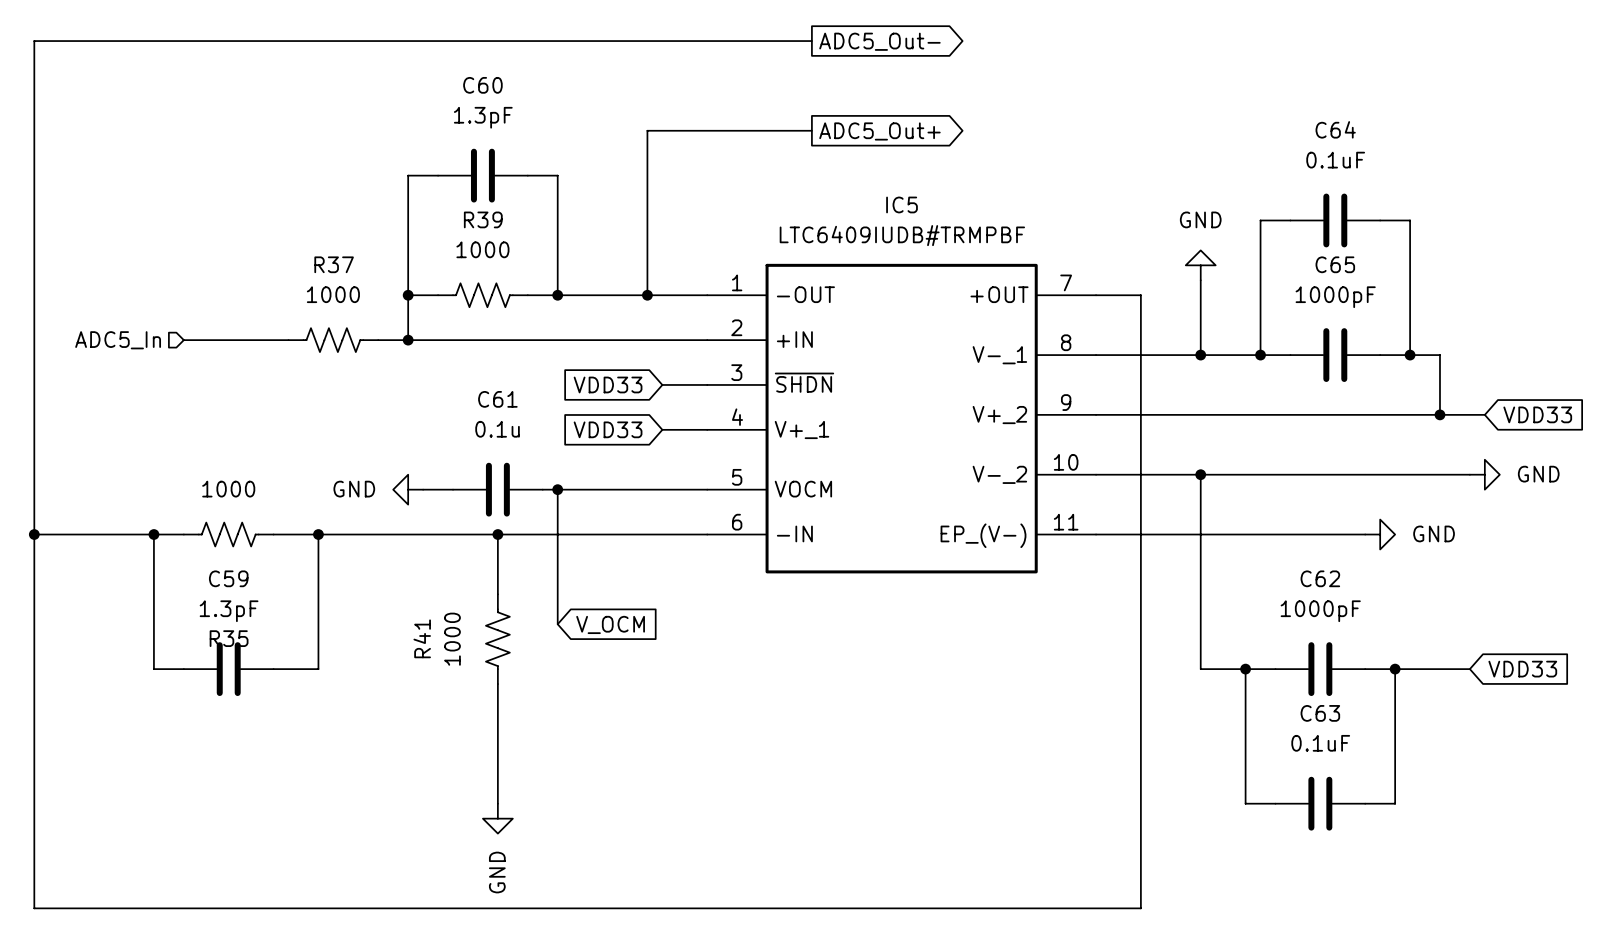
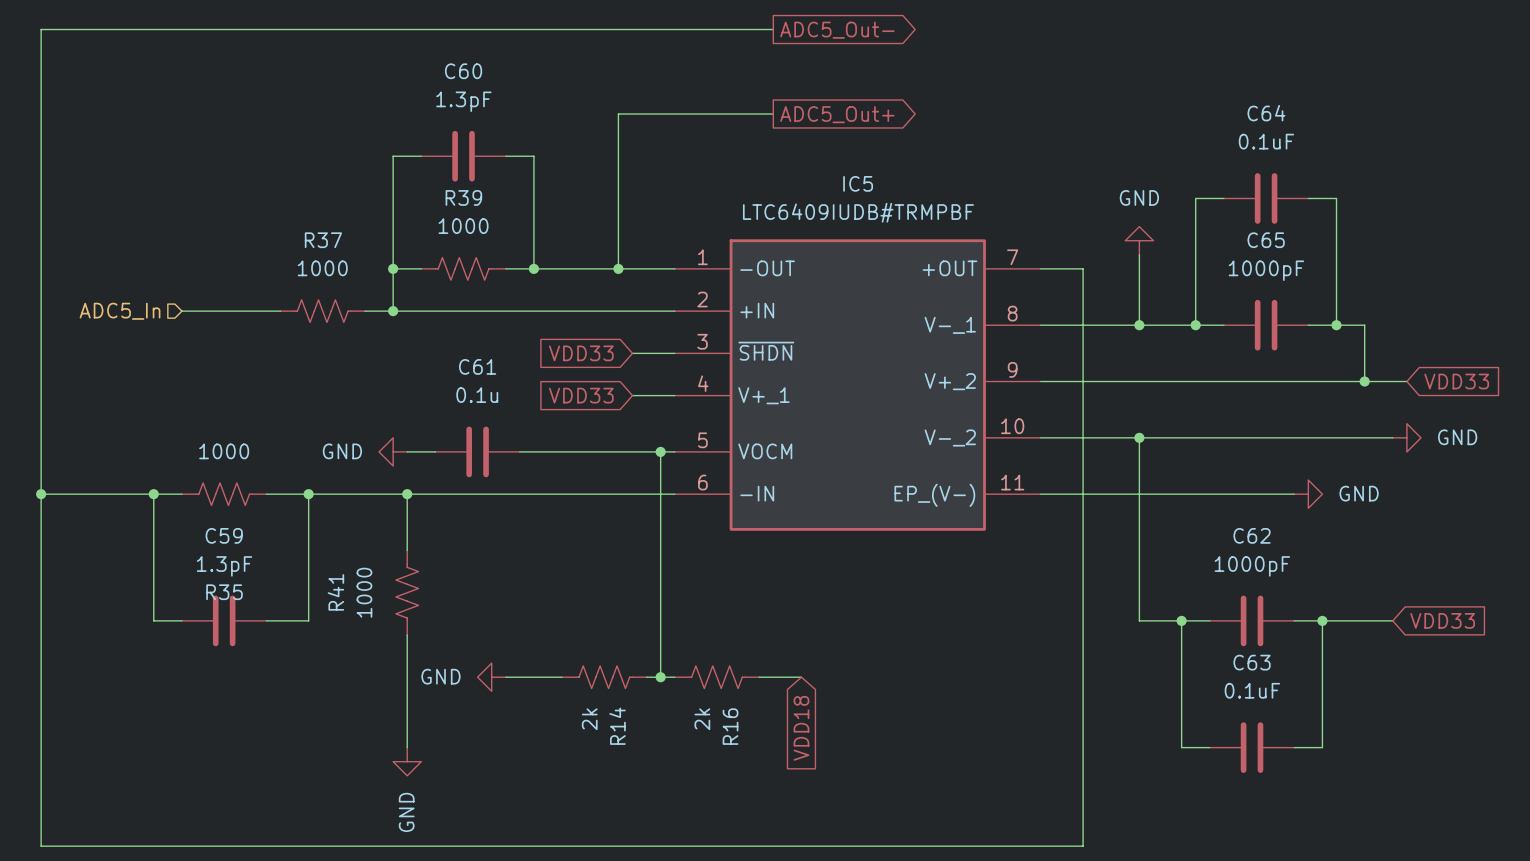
wire: (557, 489) (557, 624) -> none
junction: (557, 489) -> none
wire: none -> (660, 451) (660, 677)
junction: none -> (660, 451)
junction: none -> (407, 494)
wire: (497, 534) (497, 594) -> (407, 494) (407, 550)
junction: (497, 534) -> none
global label: V_OCM (610, 624) -> none
R41 position: (497, 639) -> (407, 592)
wire: (497, 684) (497, 803) -> (407, 634) (407, 747)
power symbol: none -> GND (491, 677)
wire: none -> (505, 677) (562, 677)
R14: none -> 2k (604, 677)
wire: none -> (646, 677) (674, 677)
junction: none -> (660, 677)
R16: none -> 2k (716, 677)
wire: none -> (759, 677) (801, 677)
global label: none -> VDD18 (801, 728)
power symbol: none -> GND (407, 761)
power symbol: GND (497, 818) -> none

